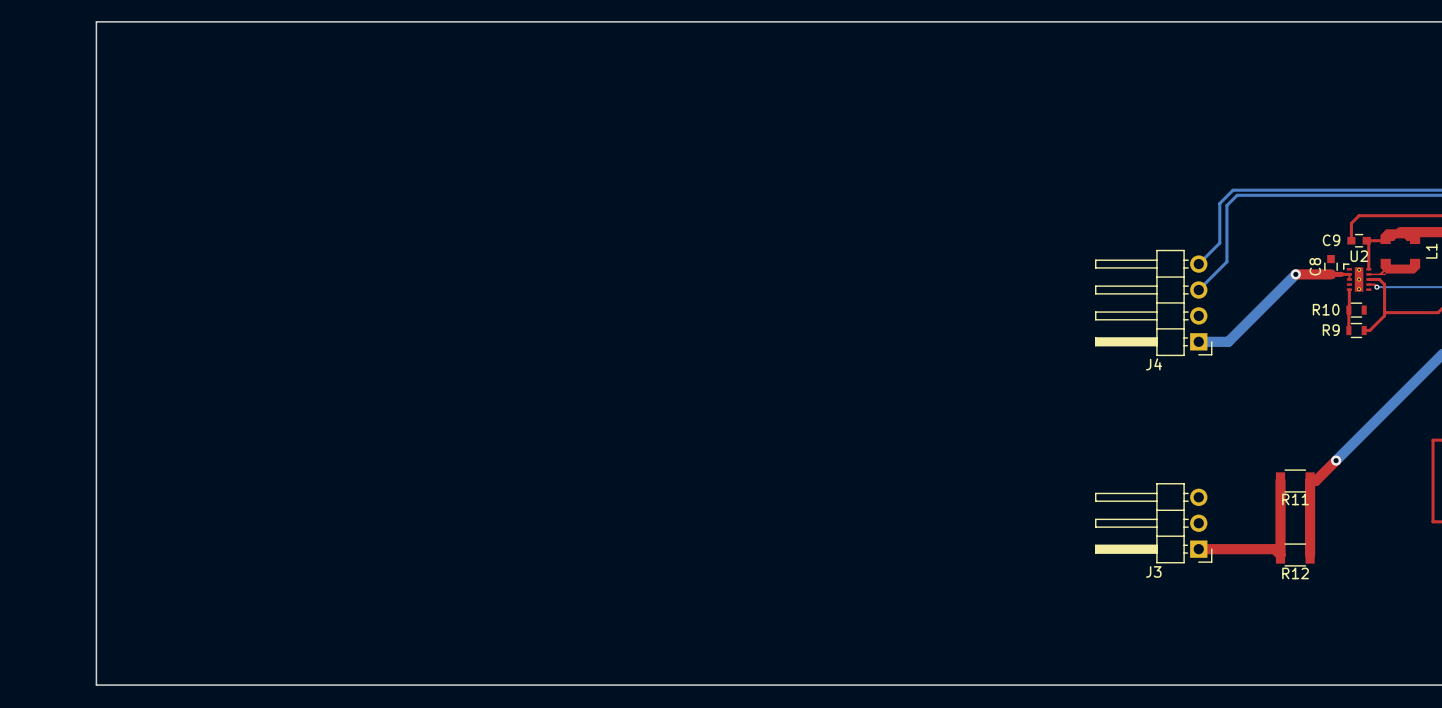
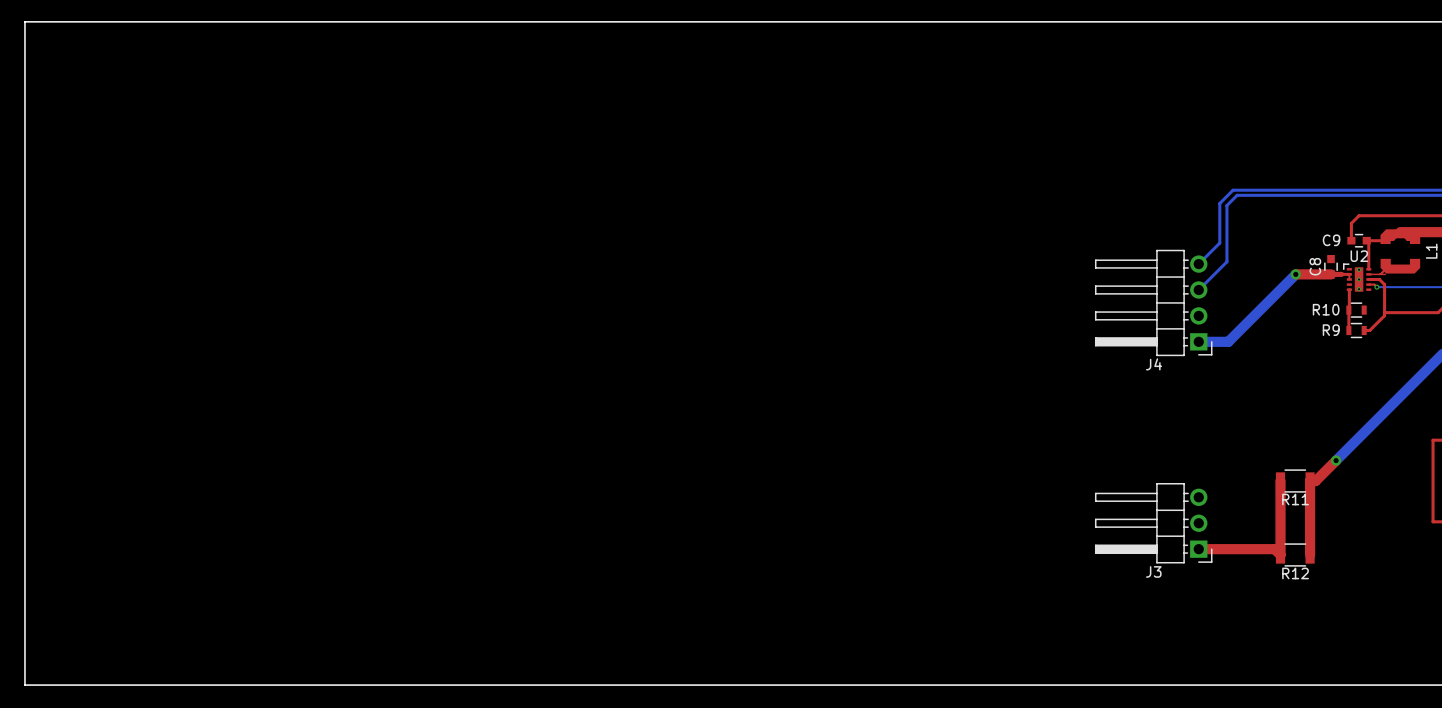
board edge: (96, 21) (96, 685) -> (96, 21) (24, 21) (24, 685) (96, 685)

